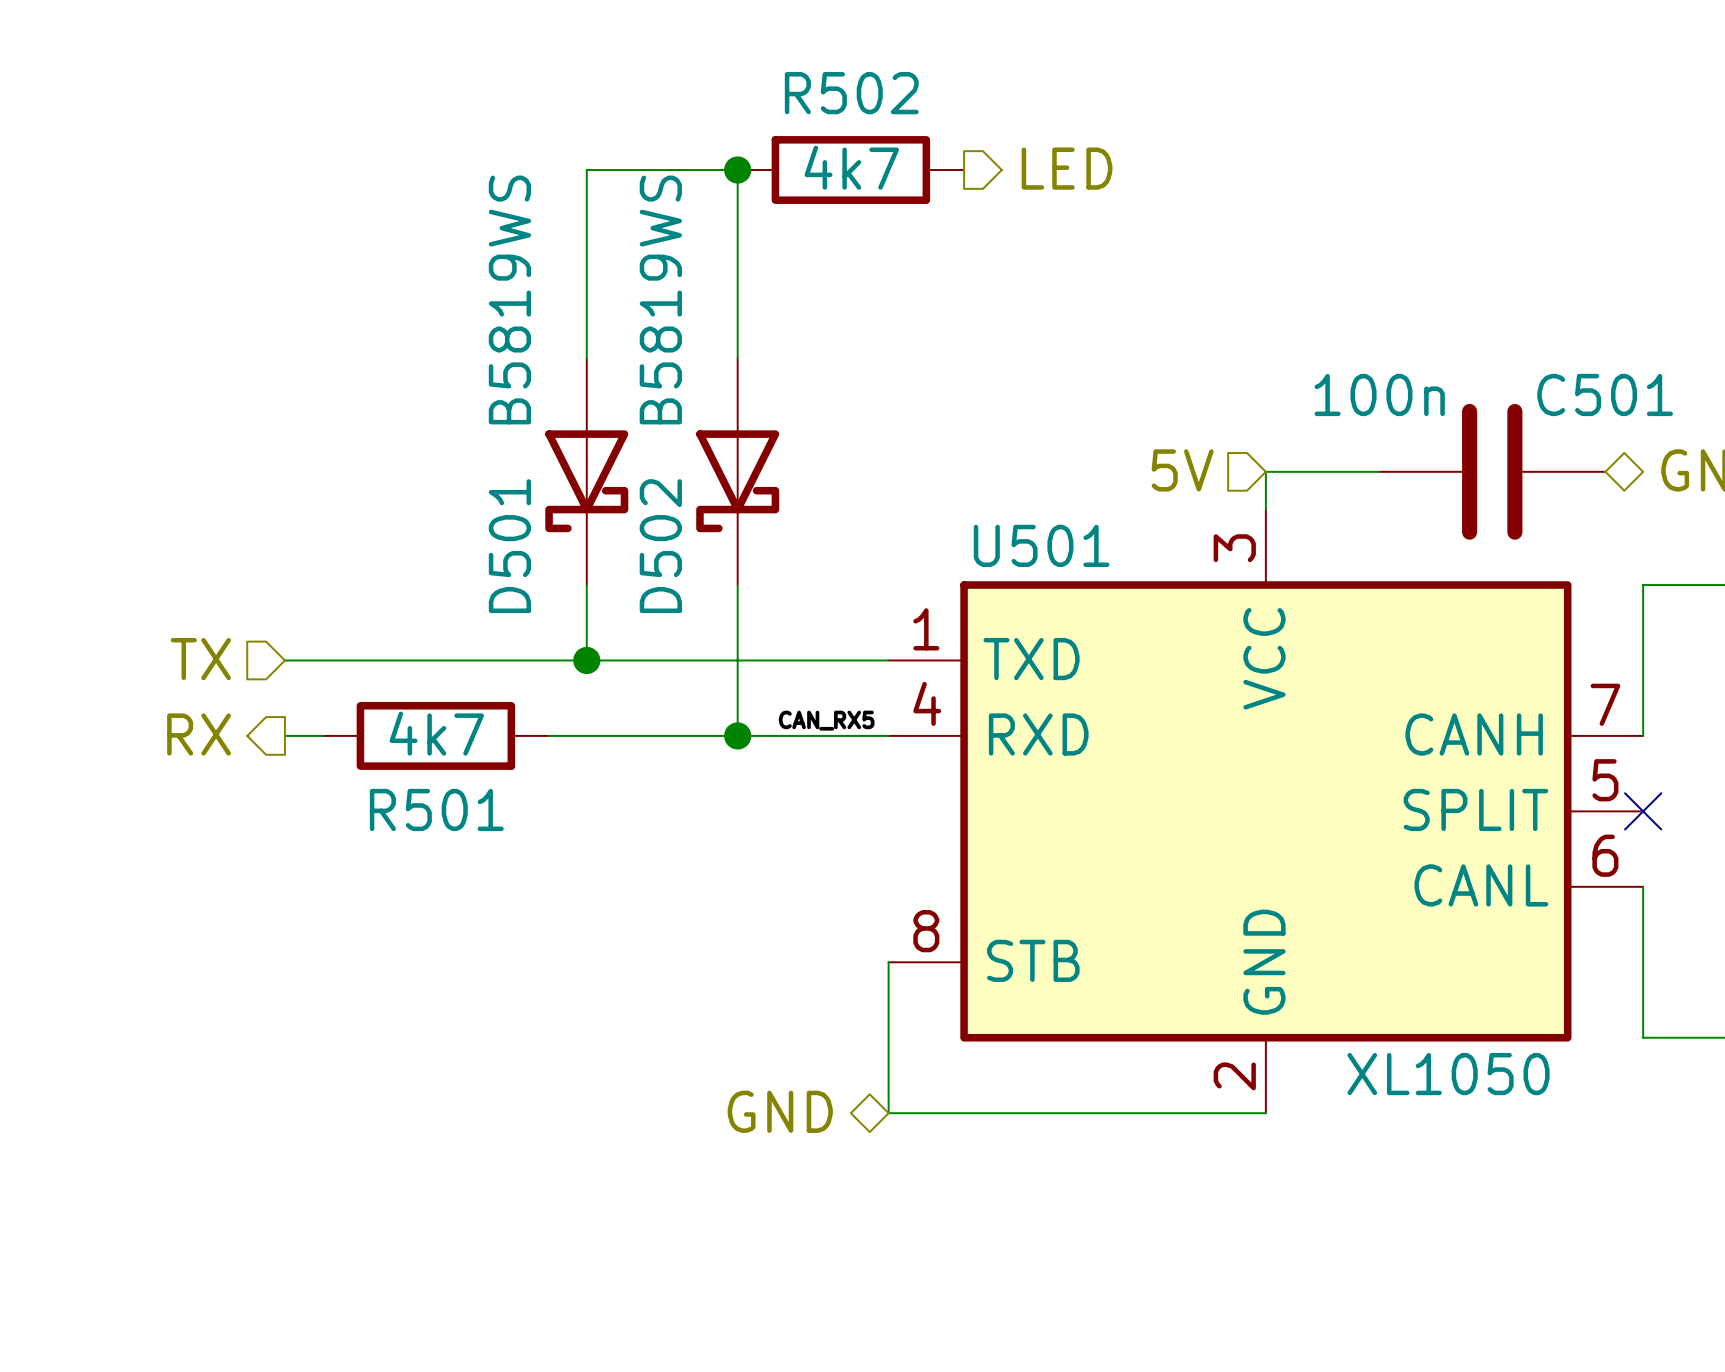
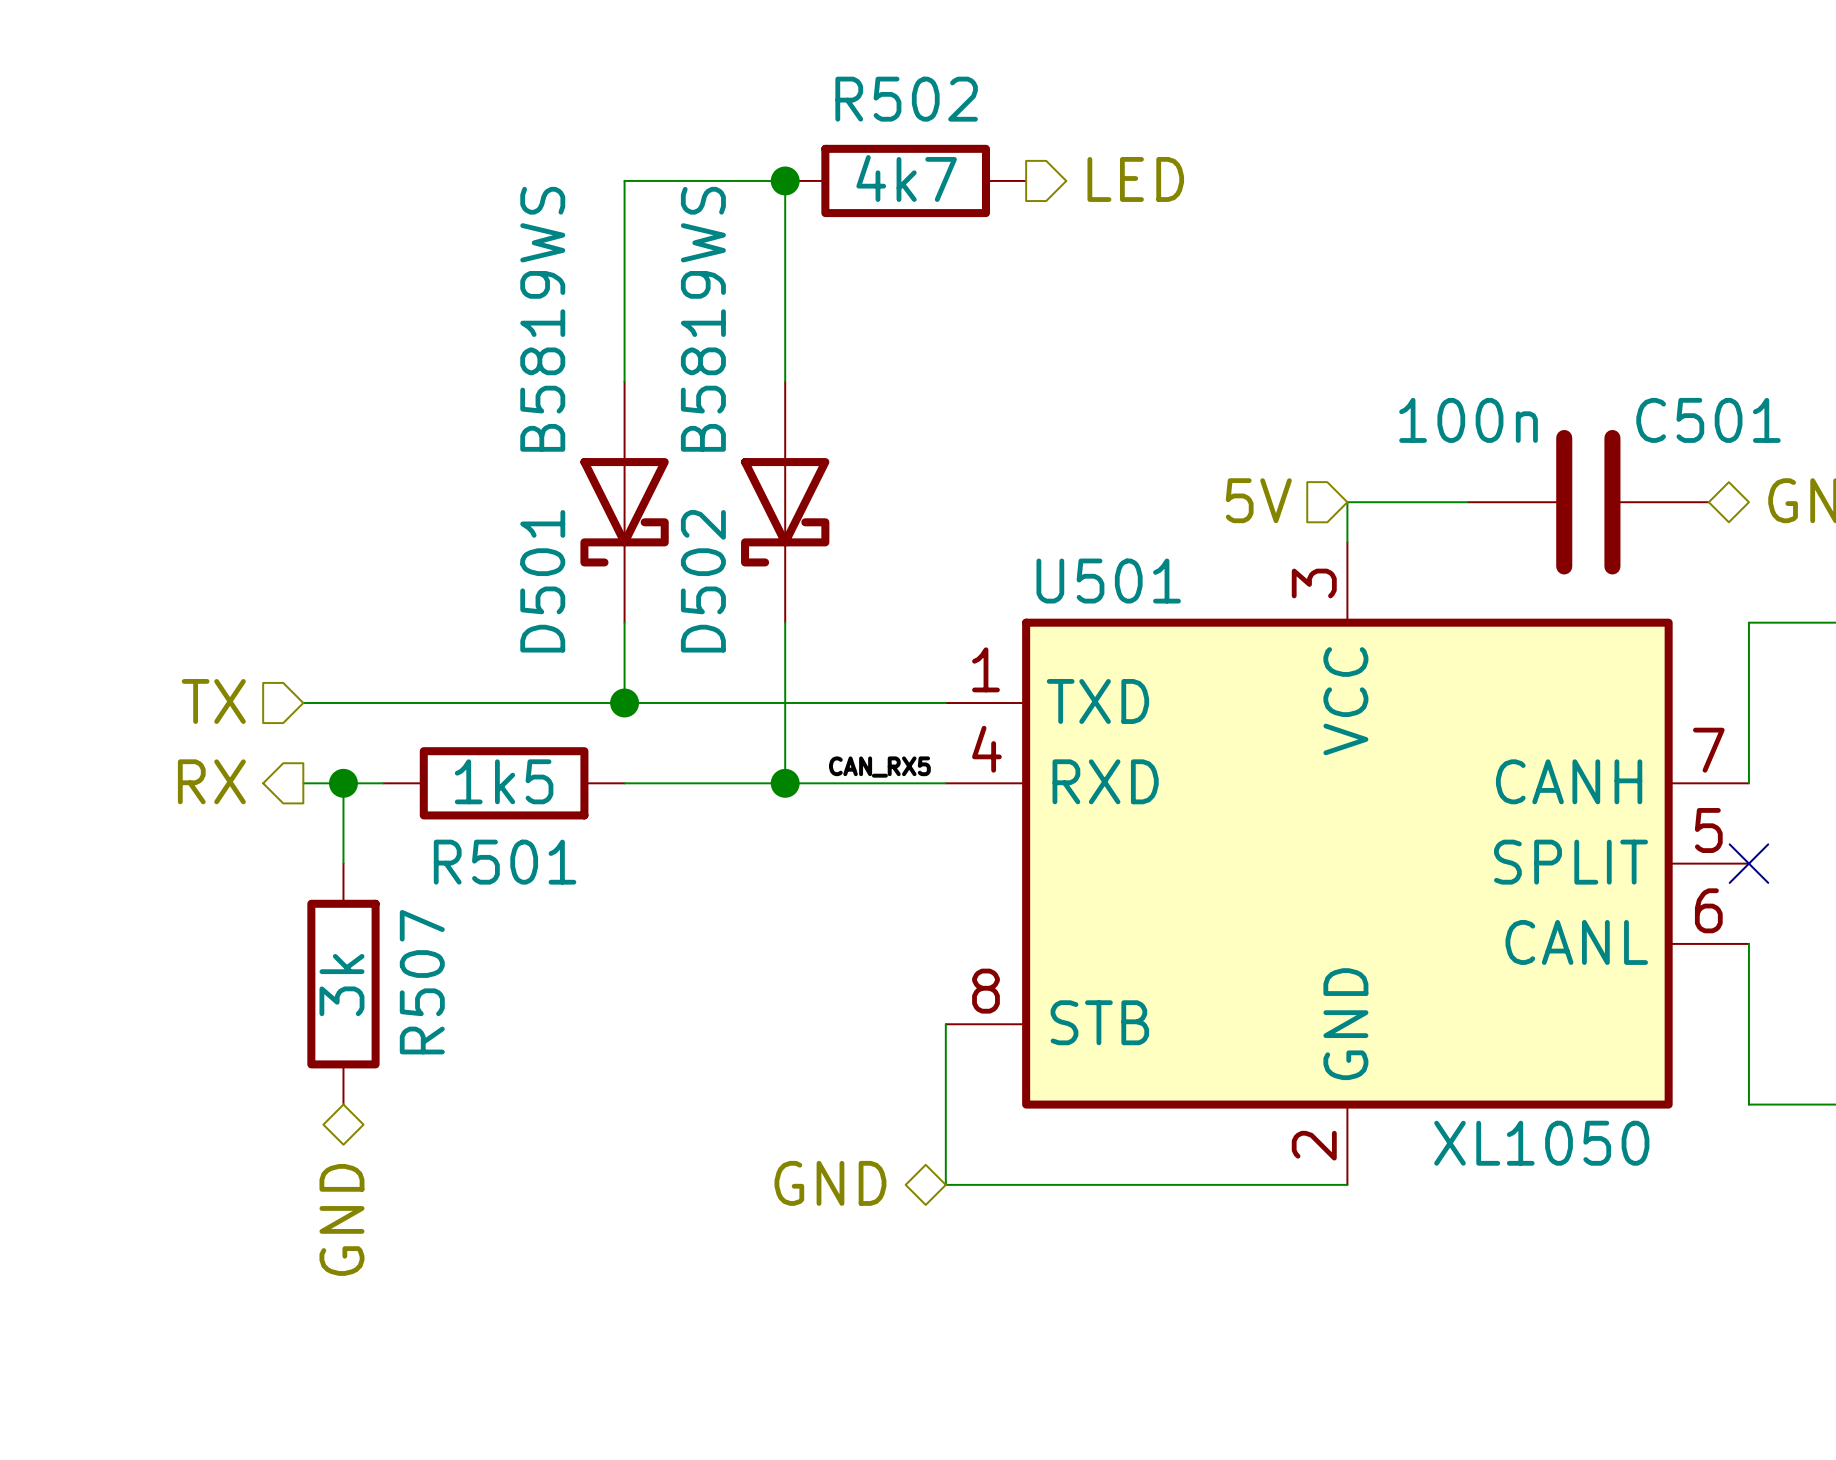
R501 value: 4k7 (436, 733) -> 1k5 (504, 781)
junction: none -> (343, 783)
wire: none -> (383, 783) (343, 783) (343, 863)
R501 position: (435, 735) -> (504, 783)
R507: none -> 3k (343, 984)
hierarchical label: none -> GND (341, 1219)

